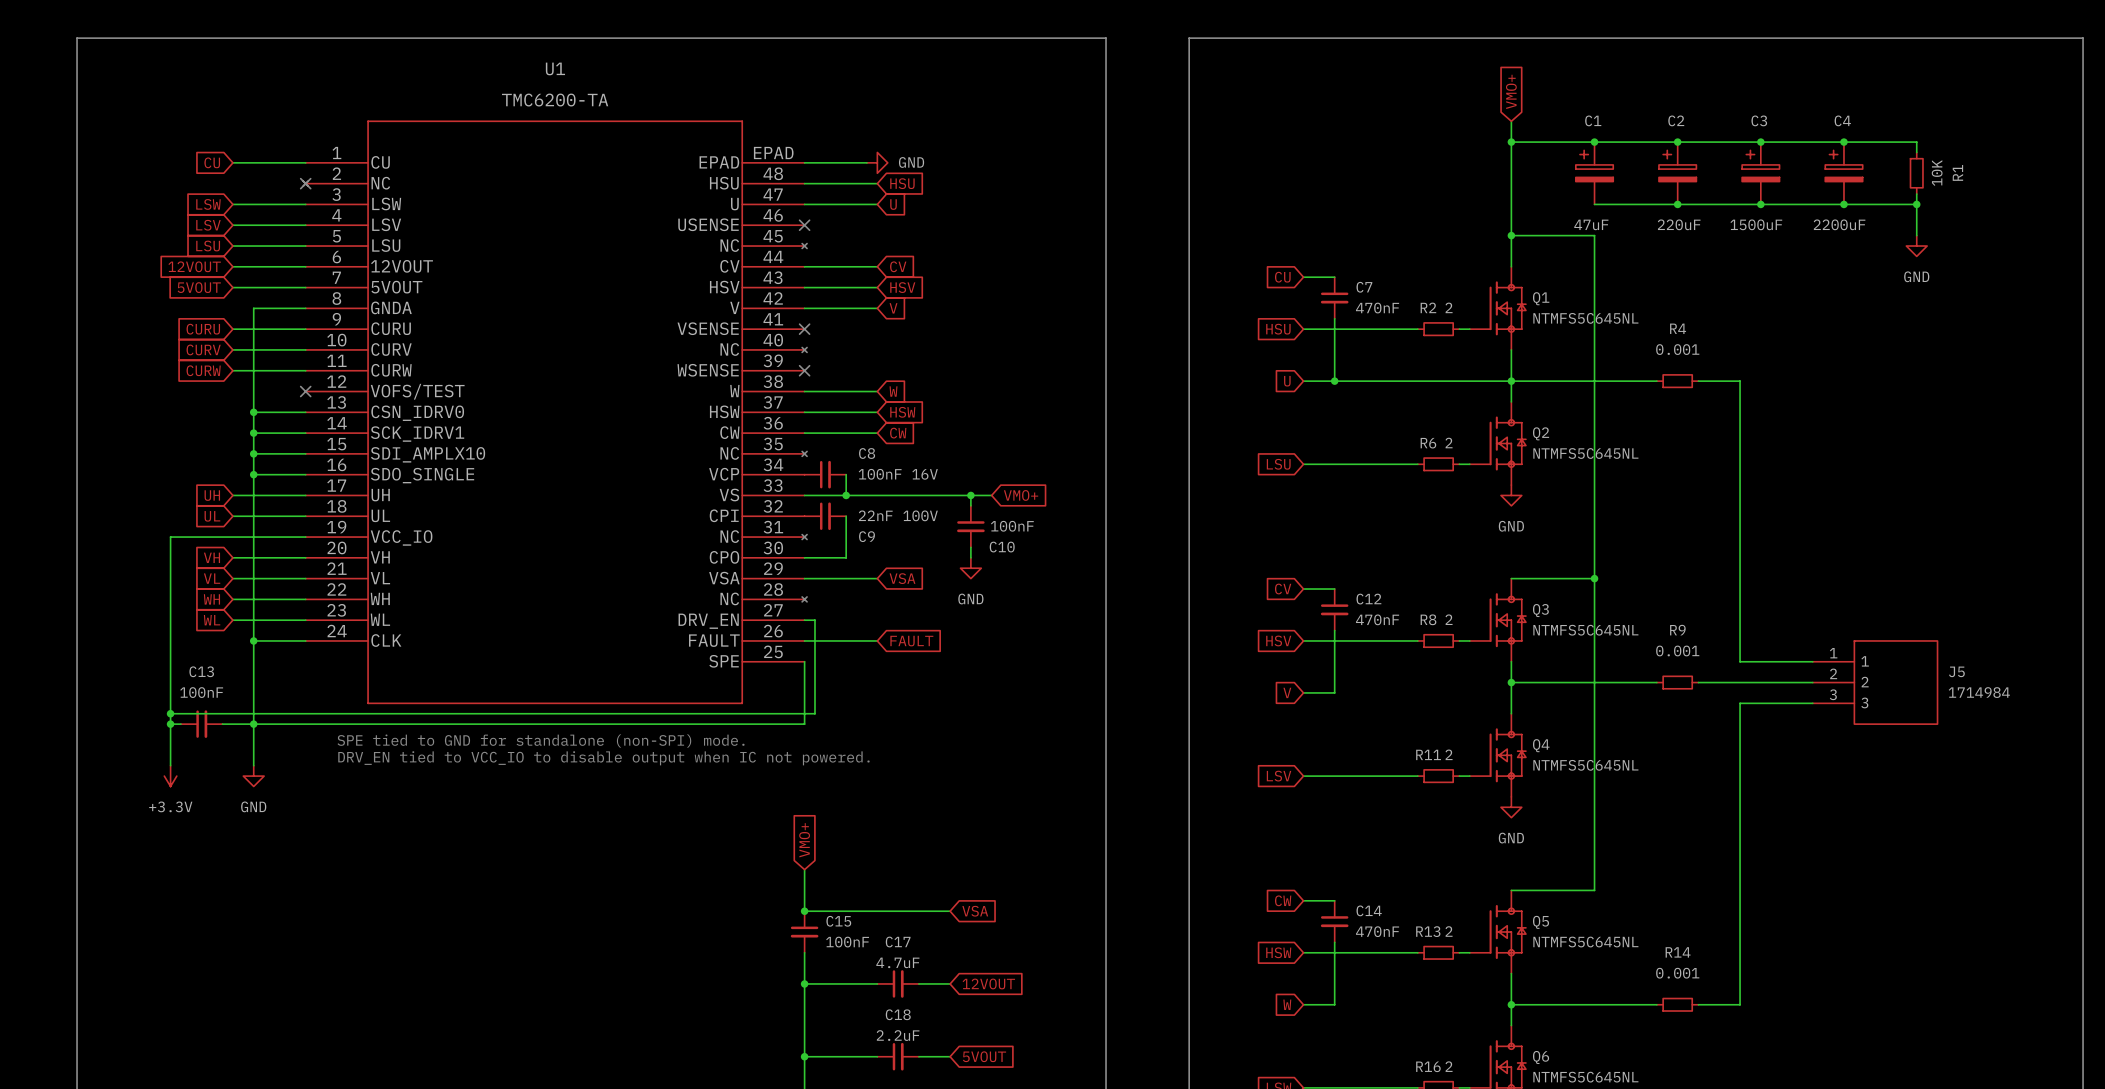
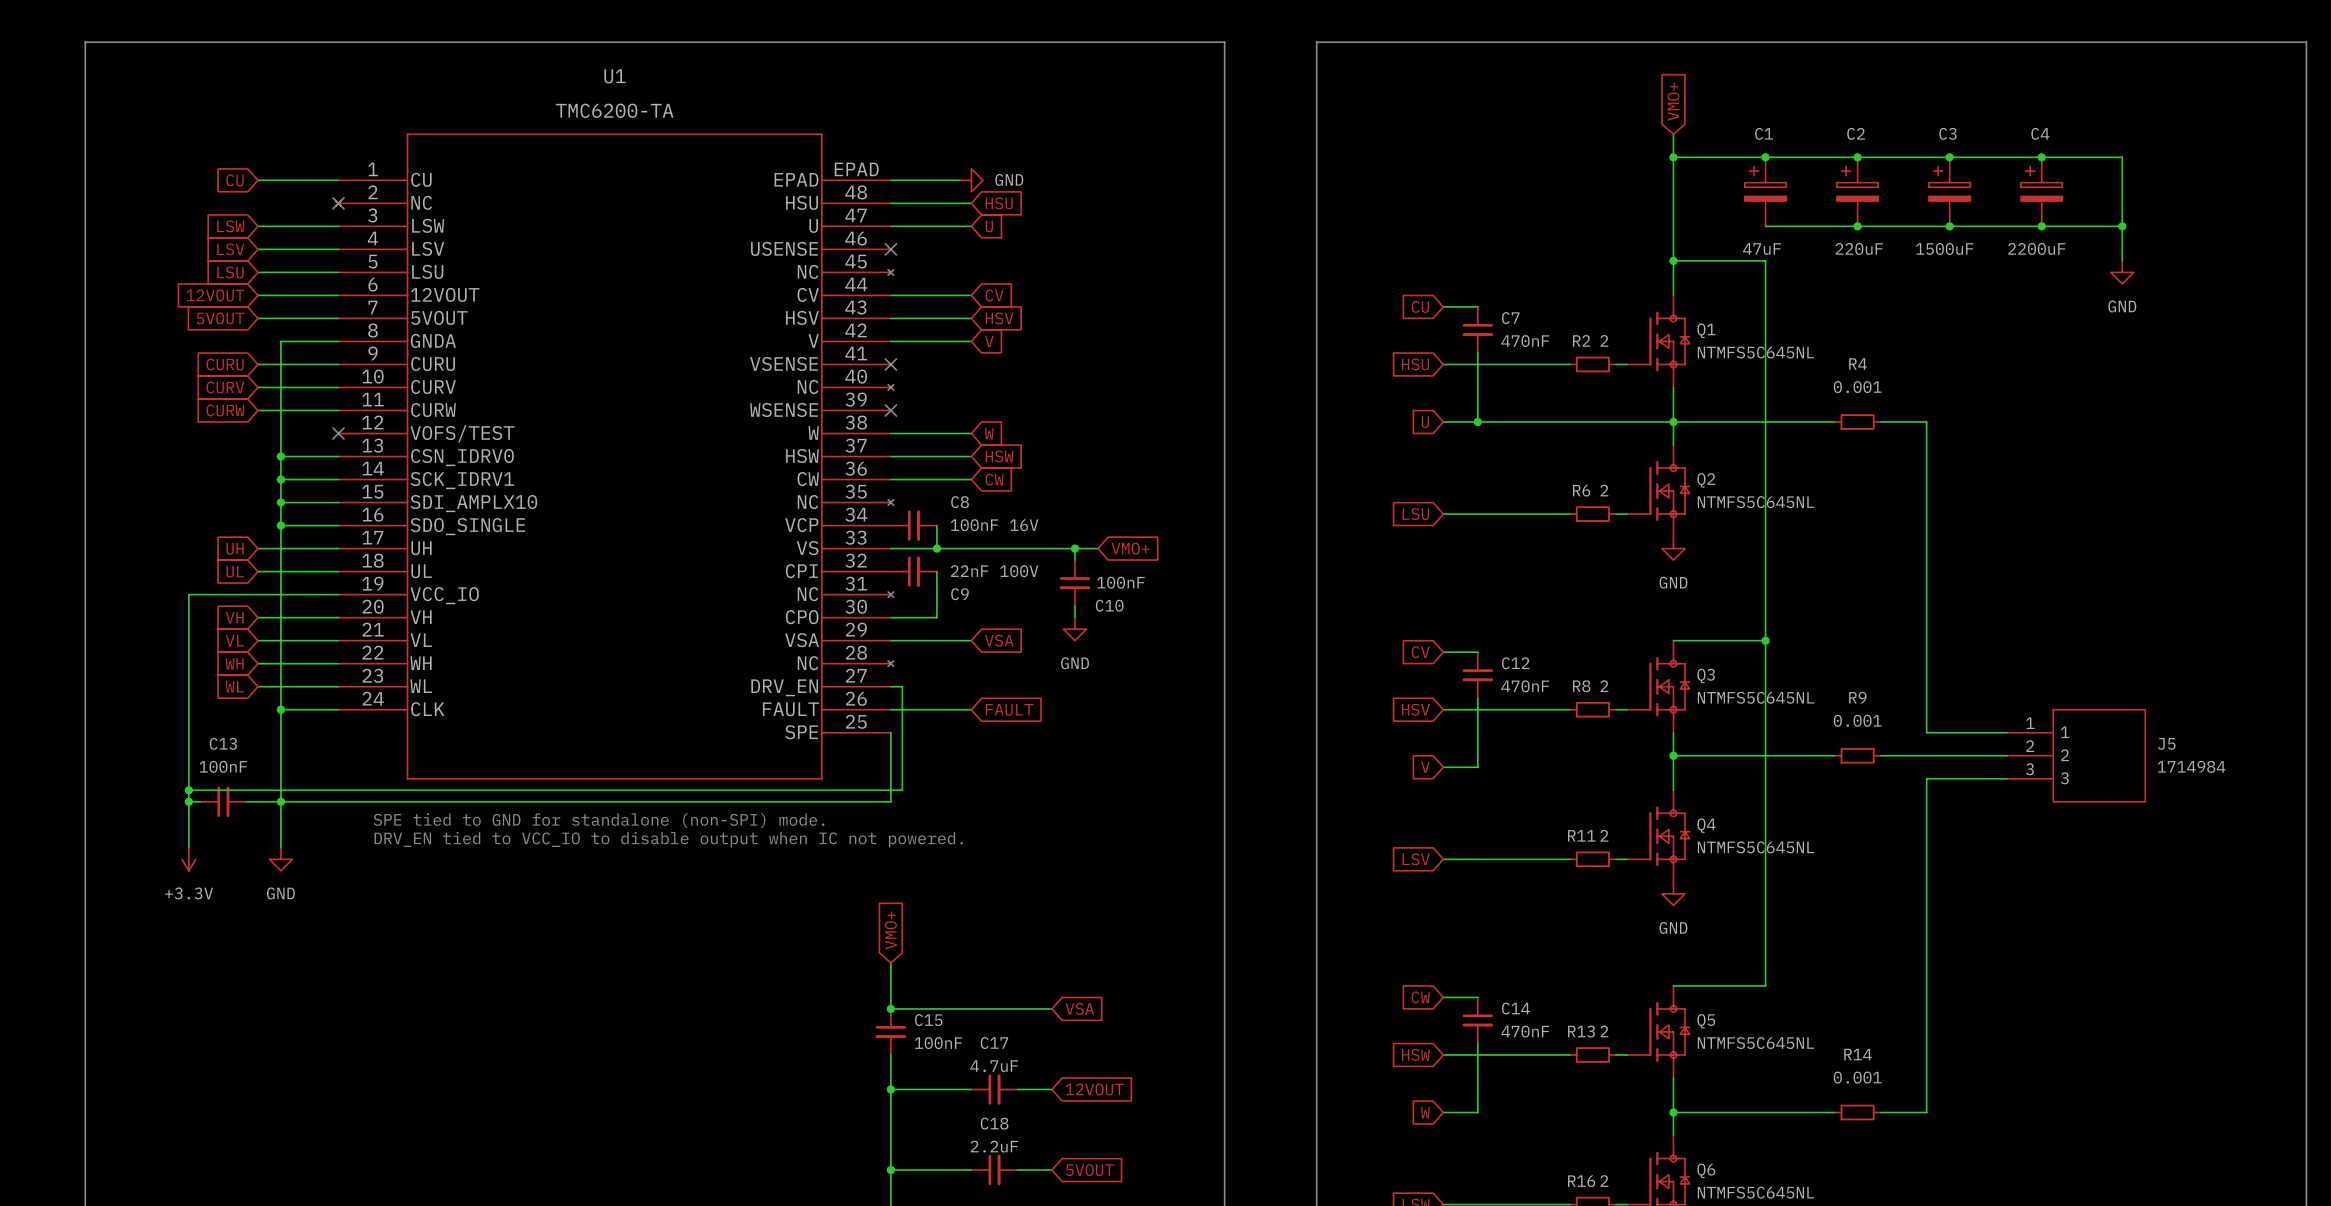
wire: none -> (2122, 168) (2122, 214)
R1: 10K (1916, 173) -> none

